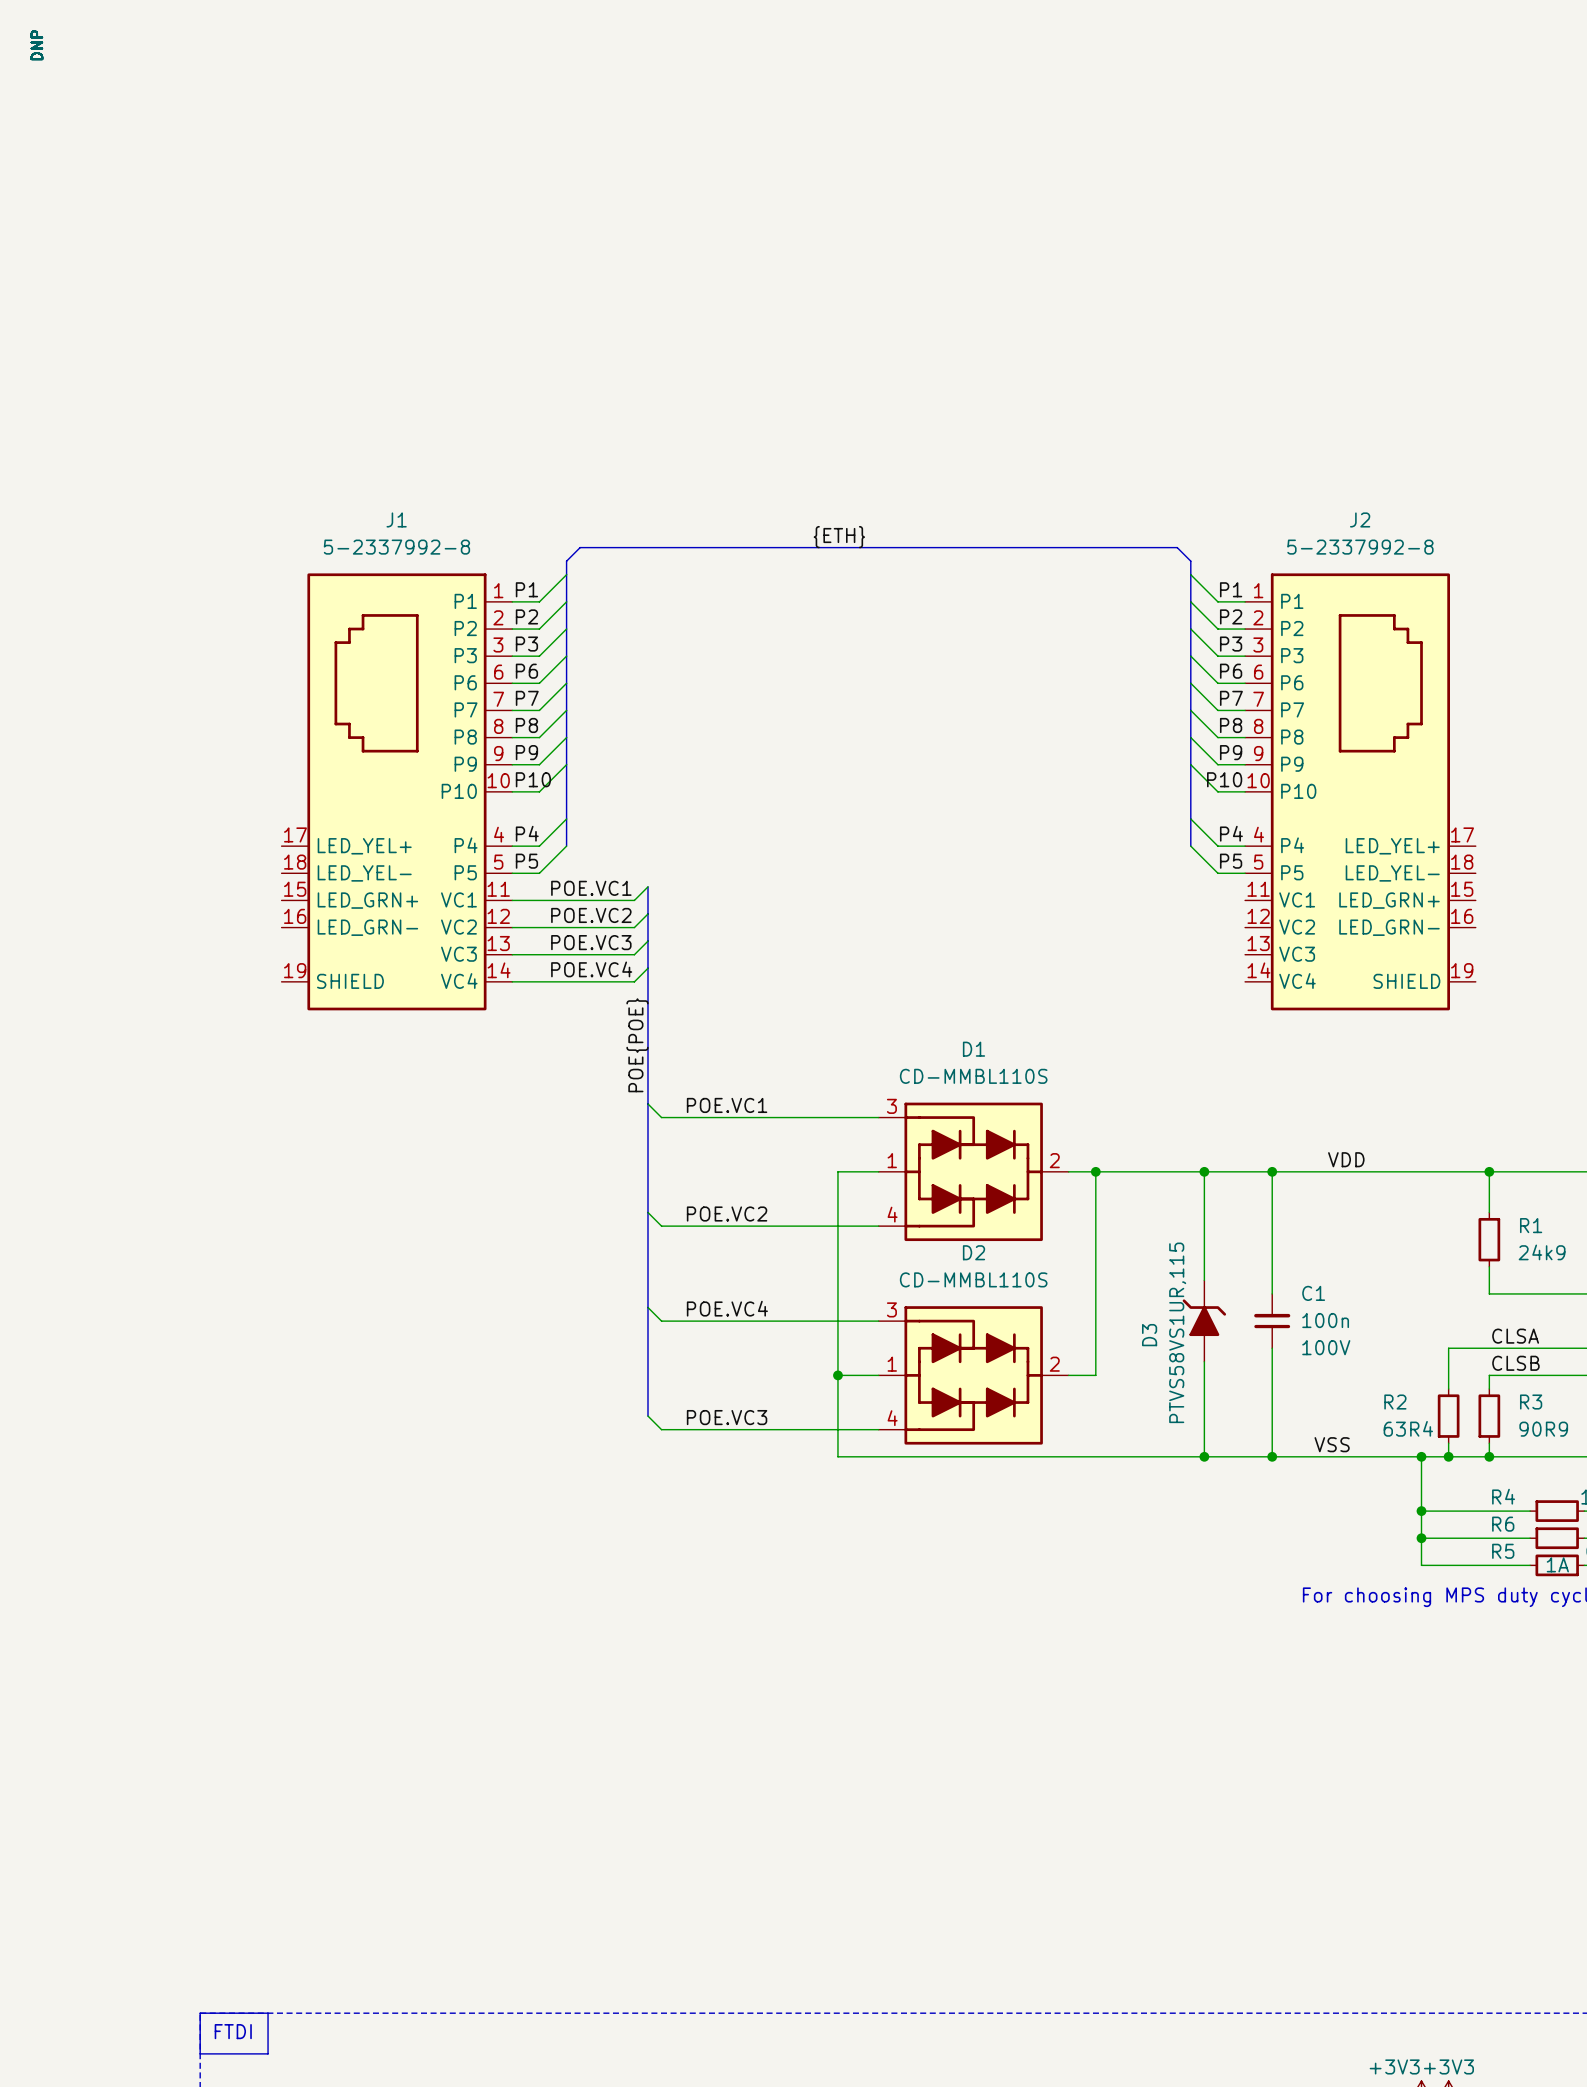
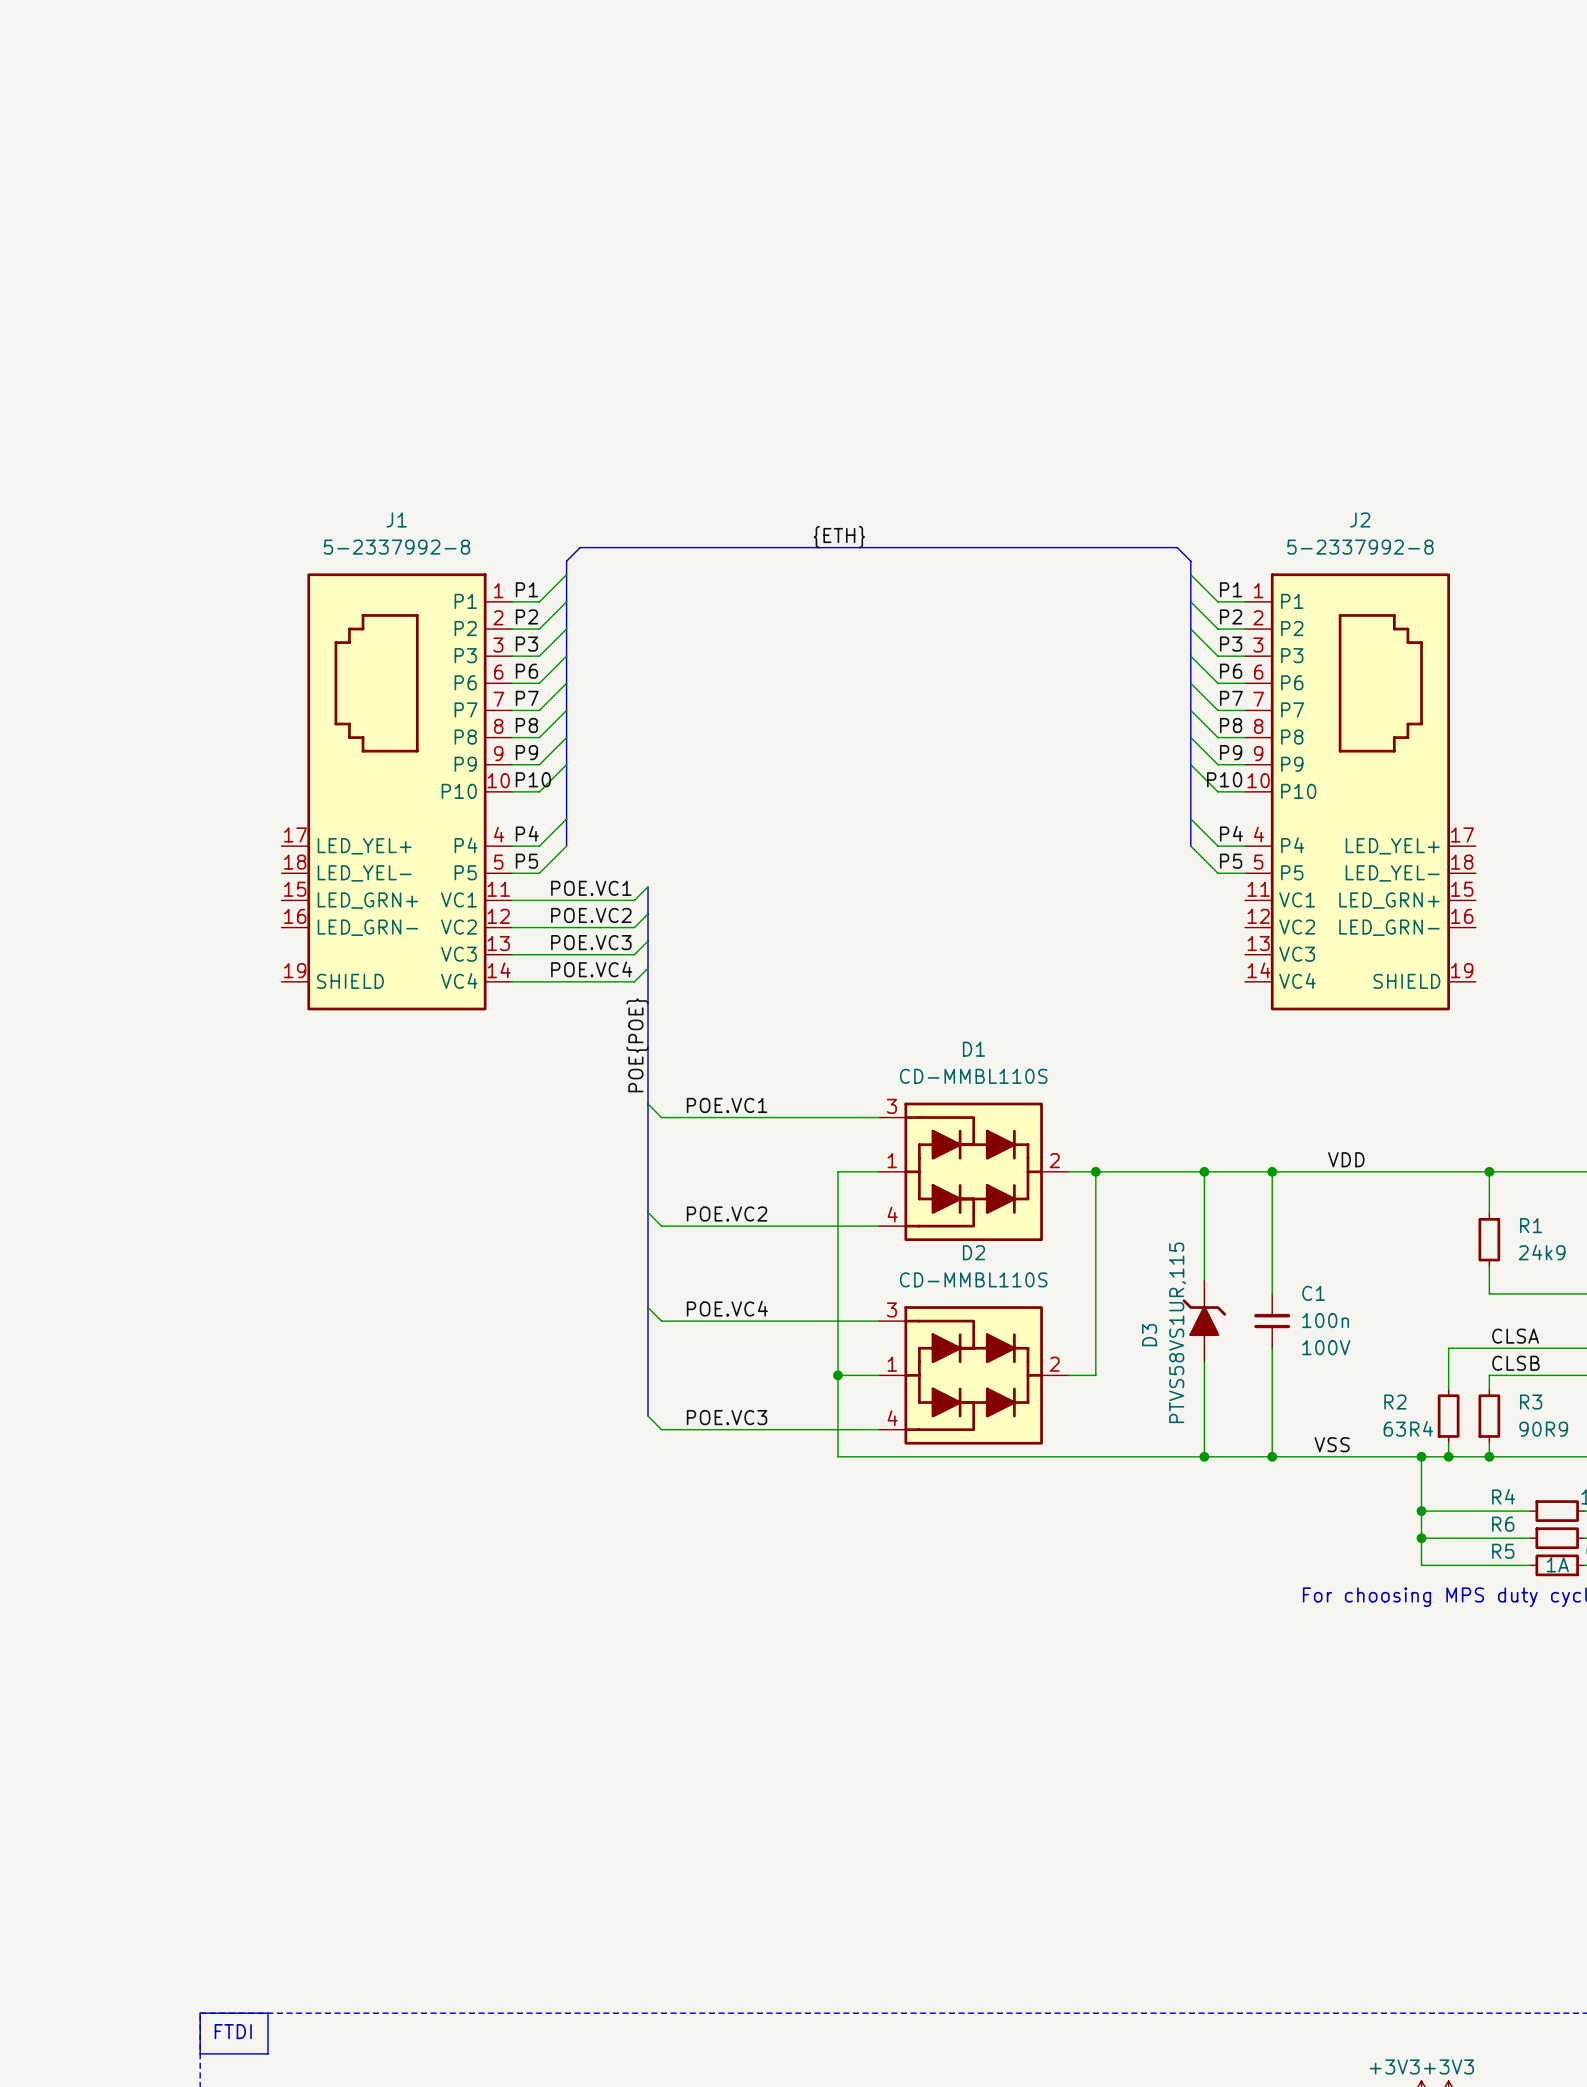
part text: DNP (36, 45) -> none
part text: DNP (36, 45) -> none
part text: DNP (36, 45) -> none
part text: DNP (36, 45) -> none
part text: DNP (36, 45) -> none
part text: DNP (36, 45) -> none
part text: DNP (36, 45) -> none
part text: DNP (36, 45) -> none
part text: DNP (36, 45) -> none

